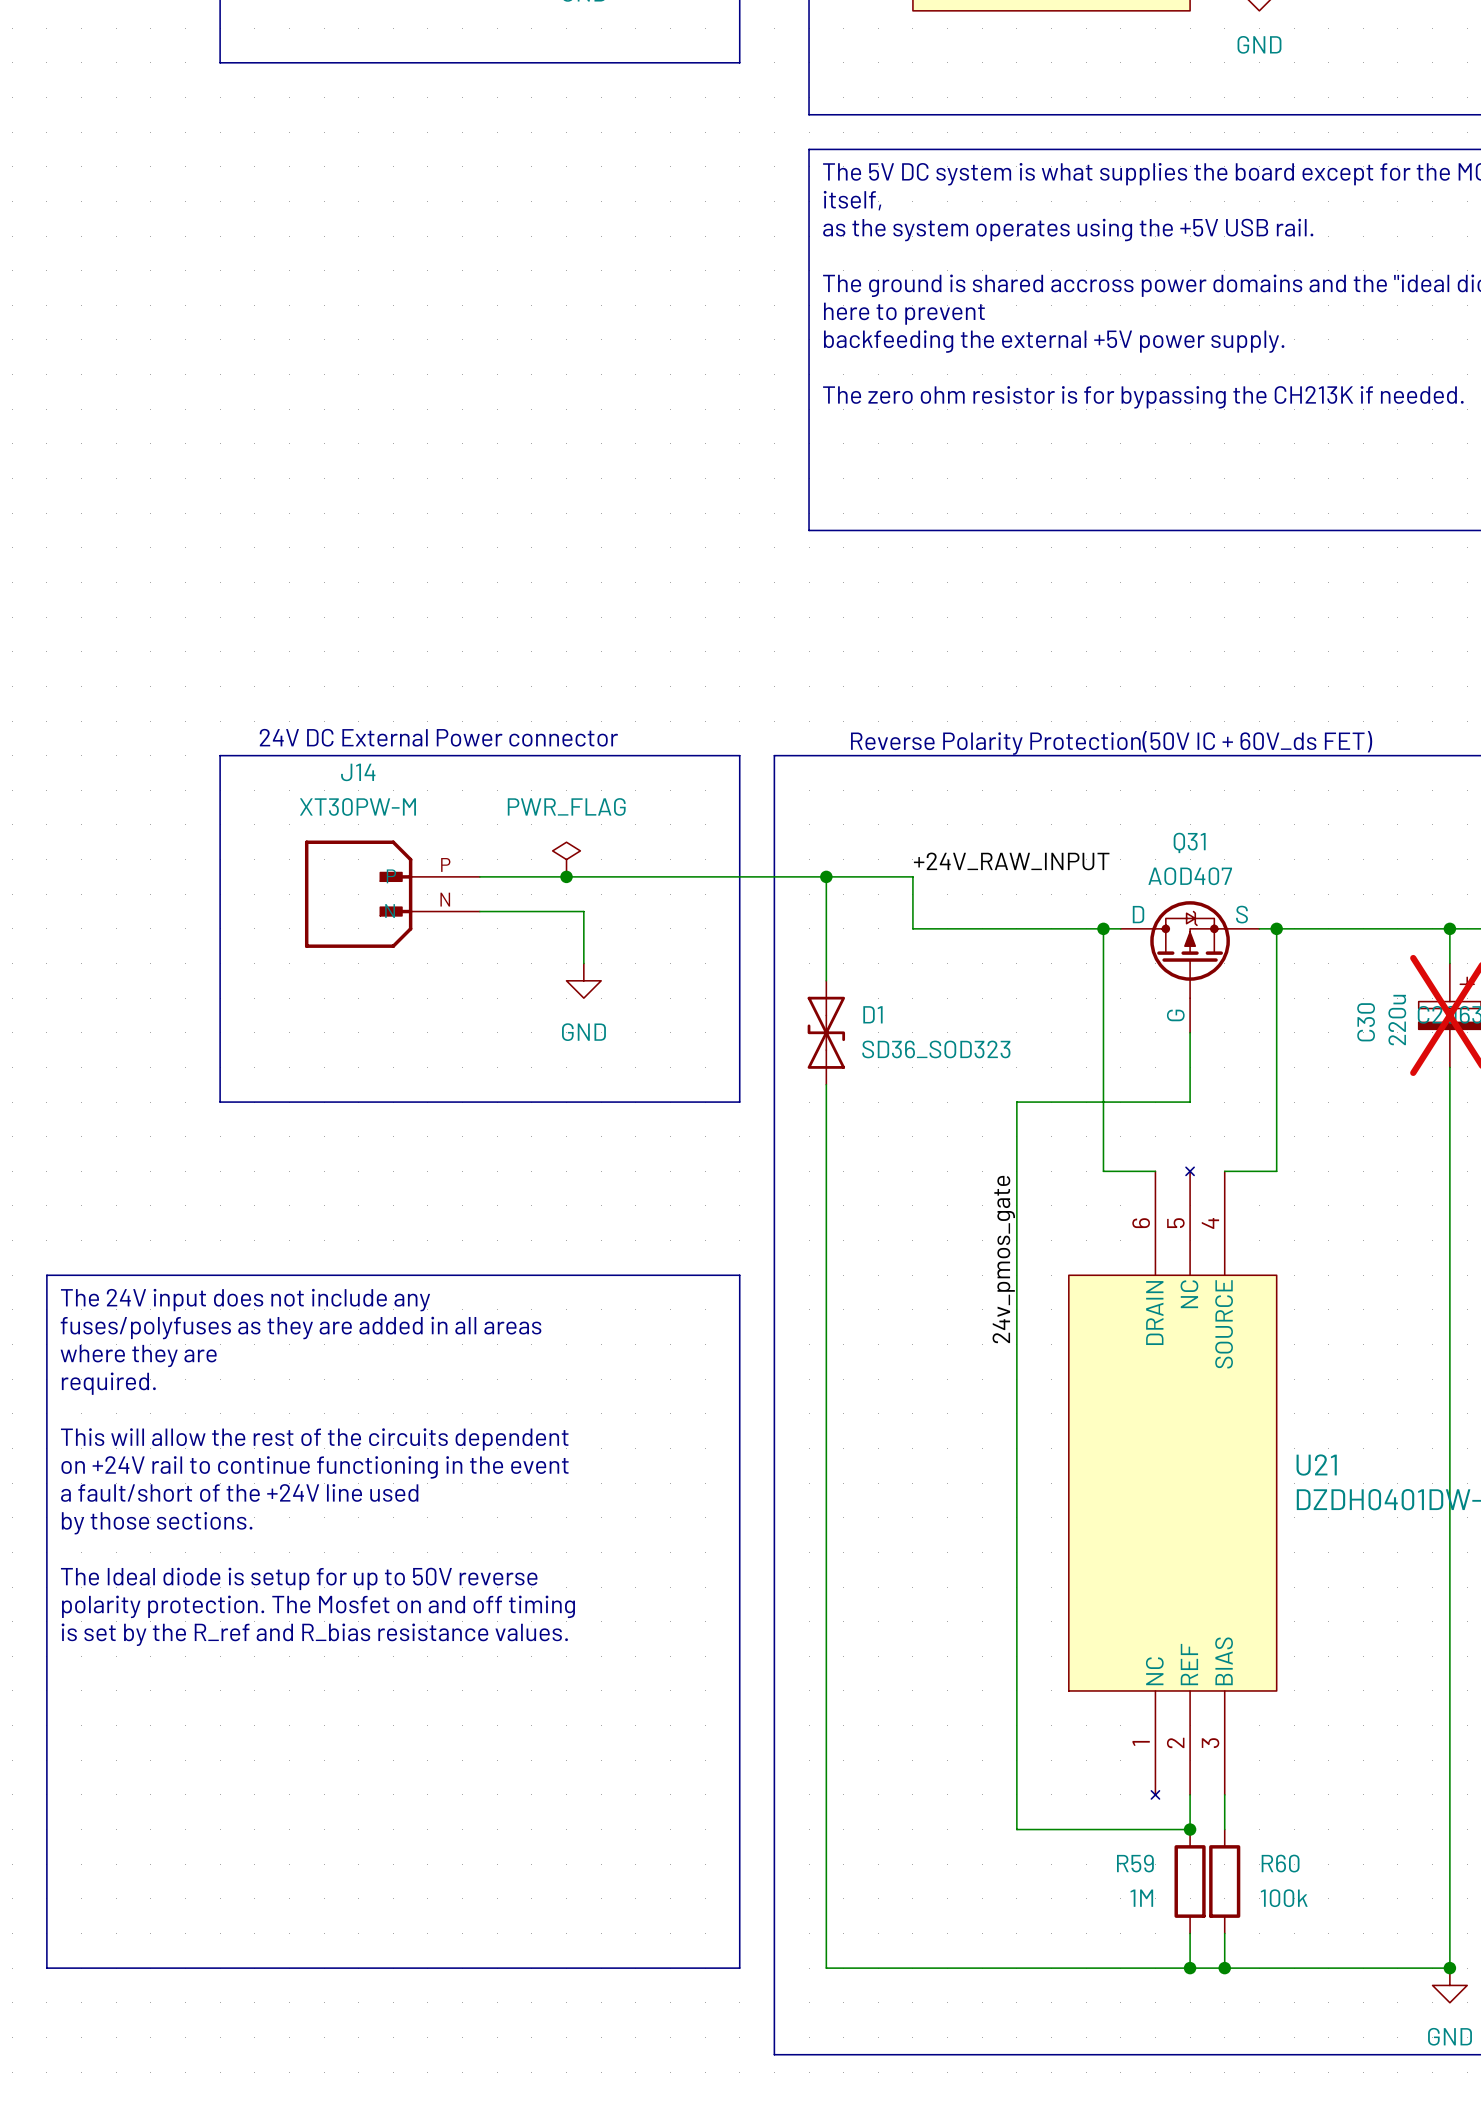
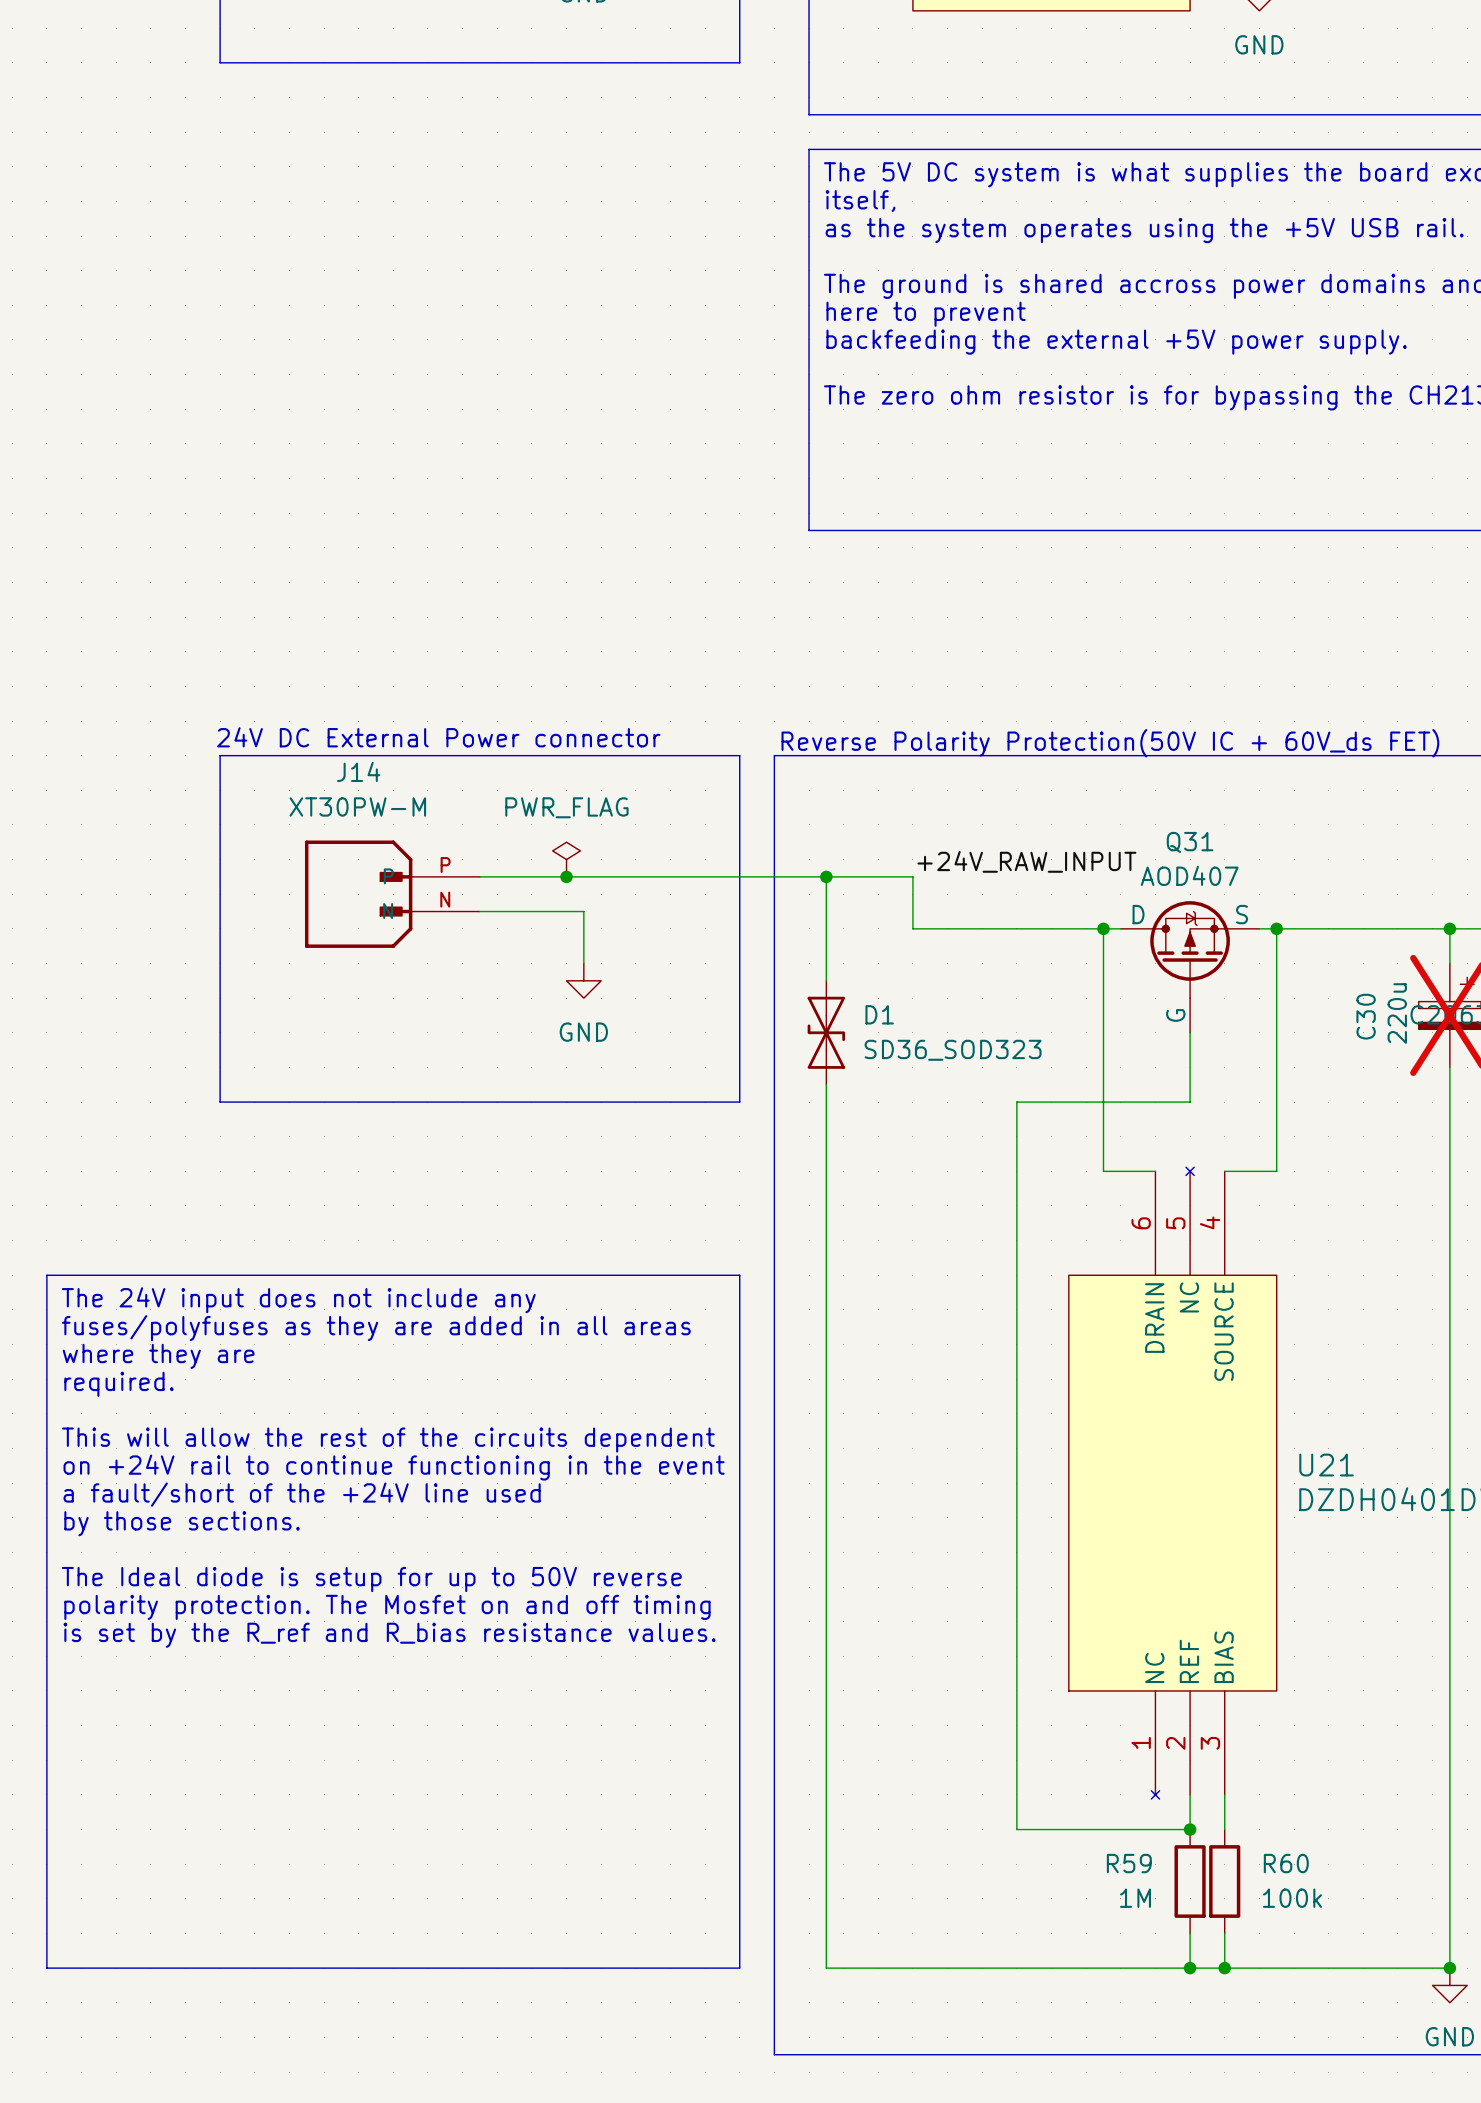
label: 24v_pmos_gate (1003, 1259) -> none

